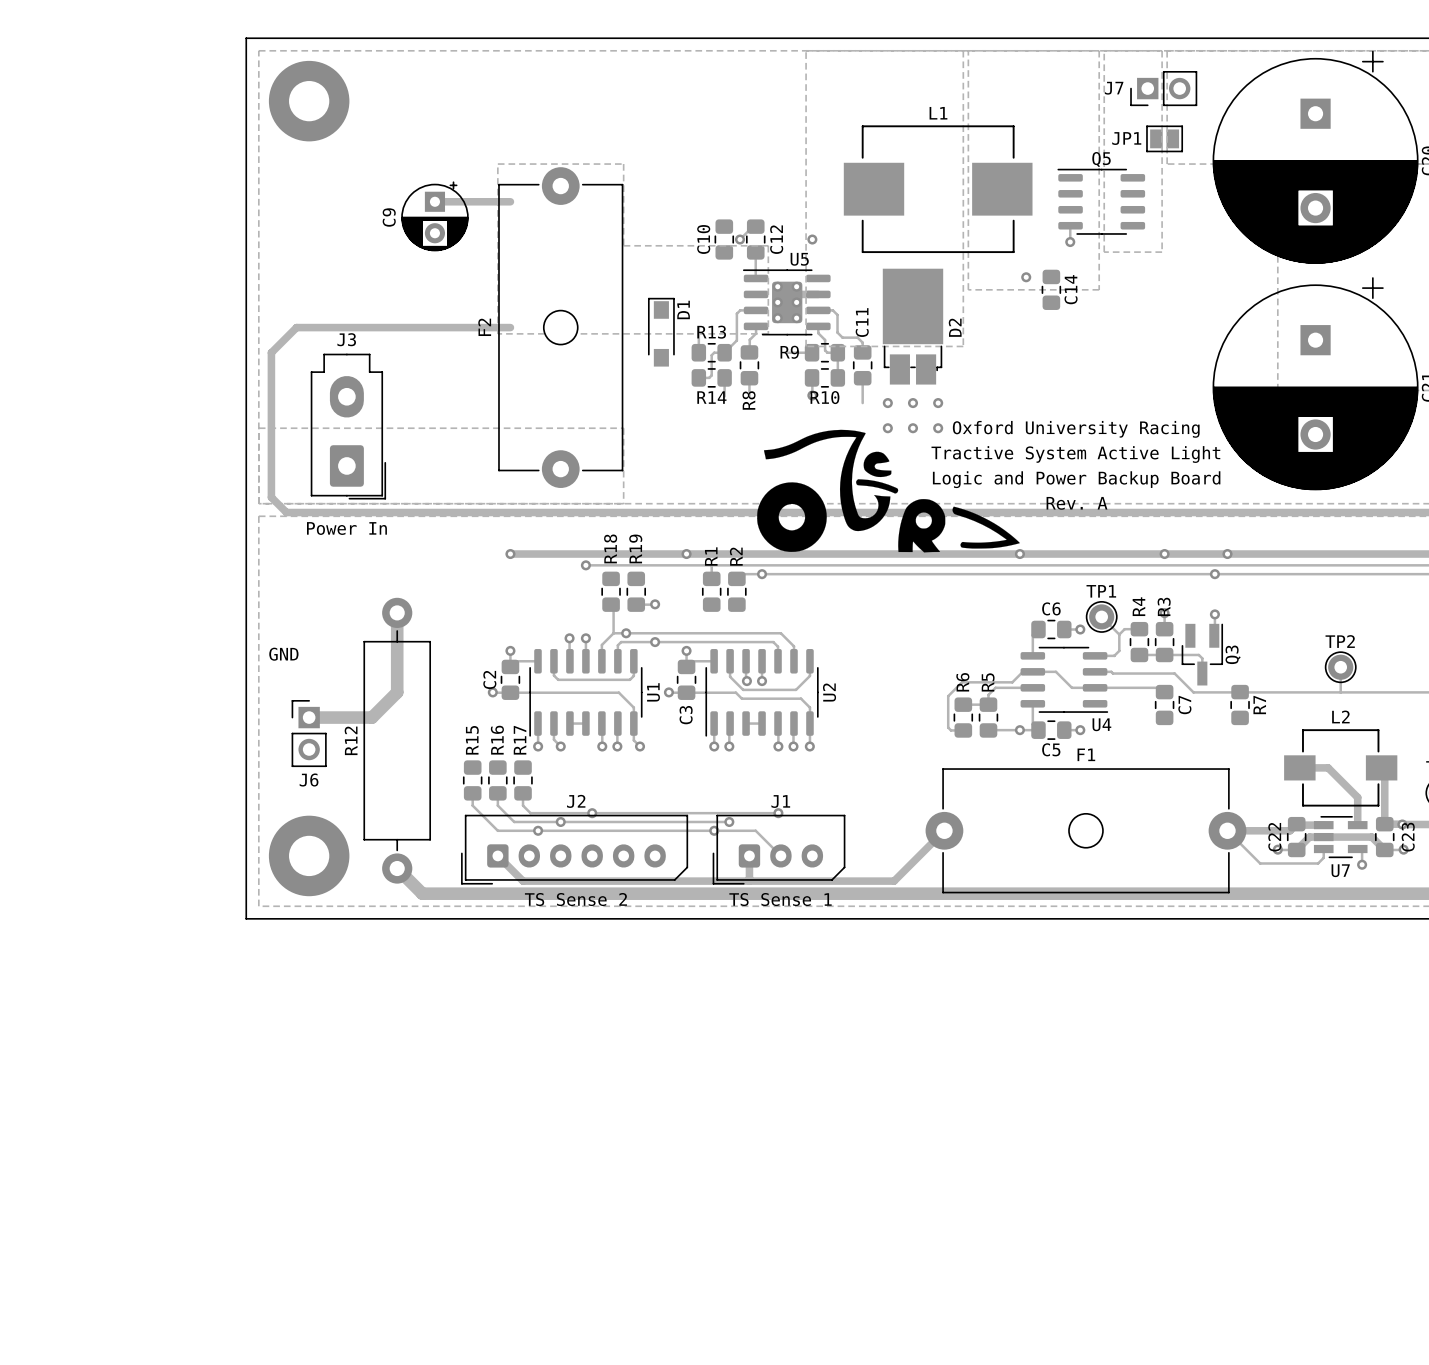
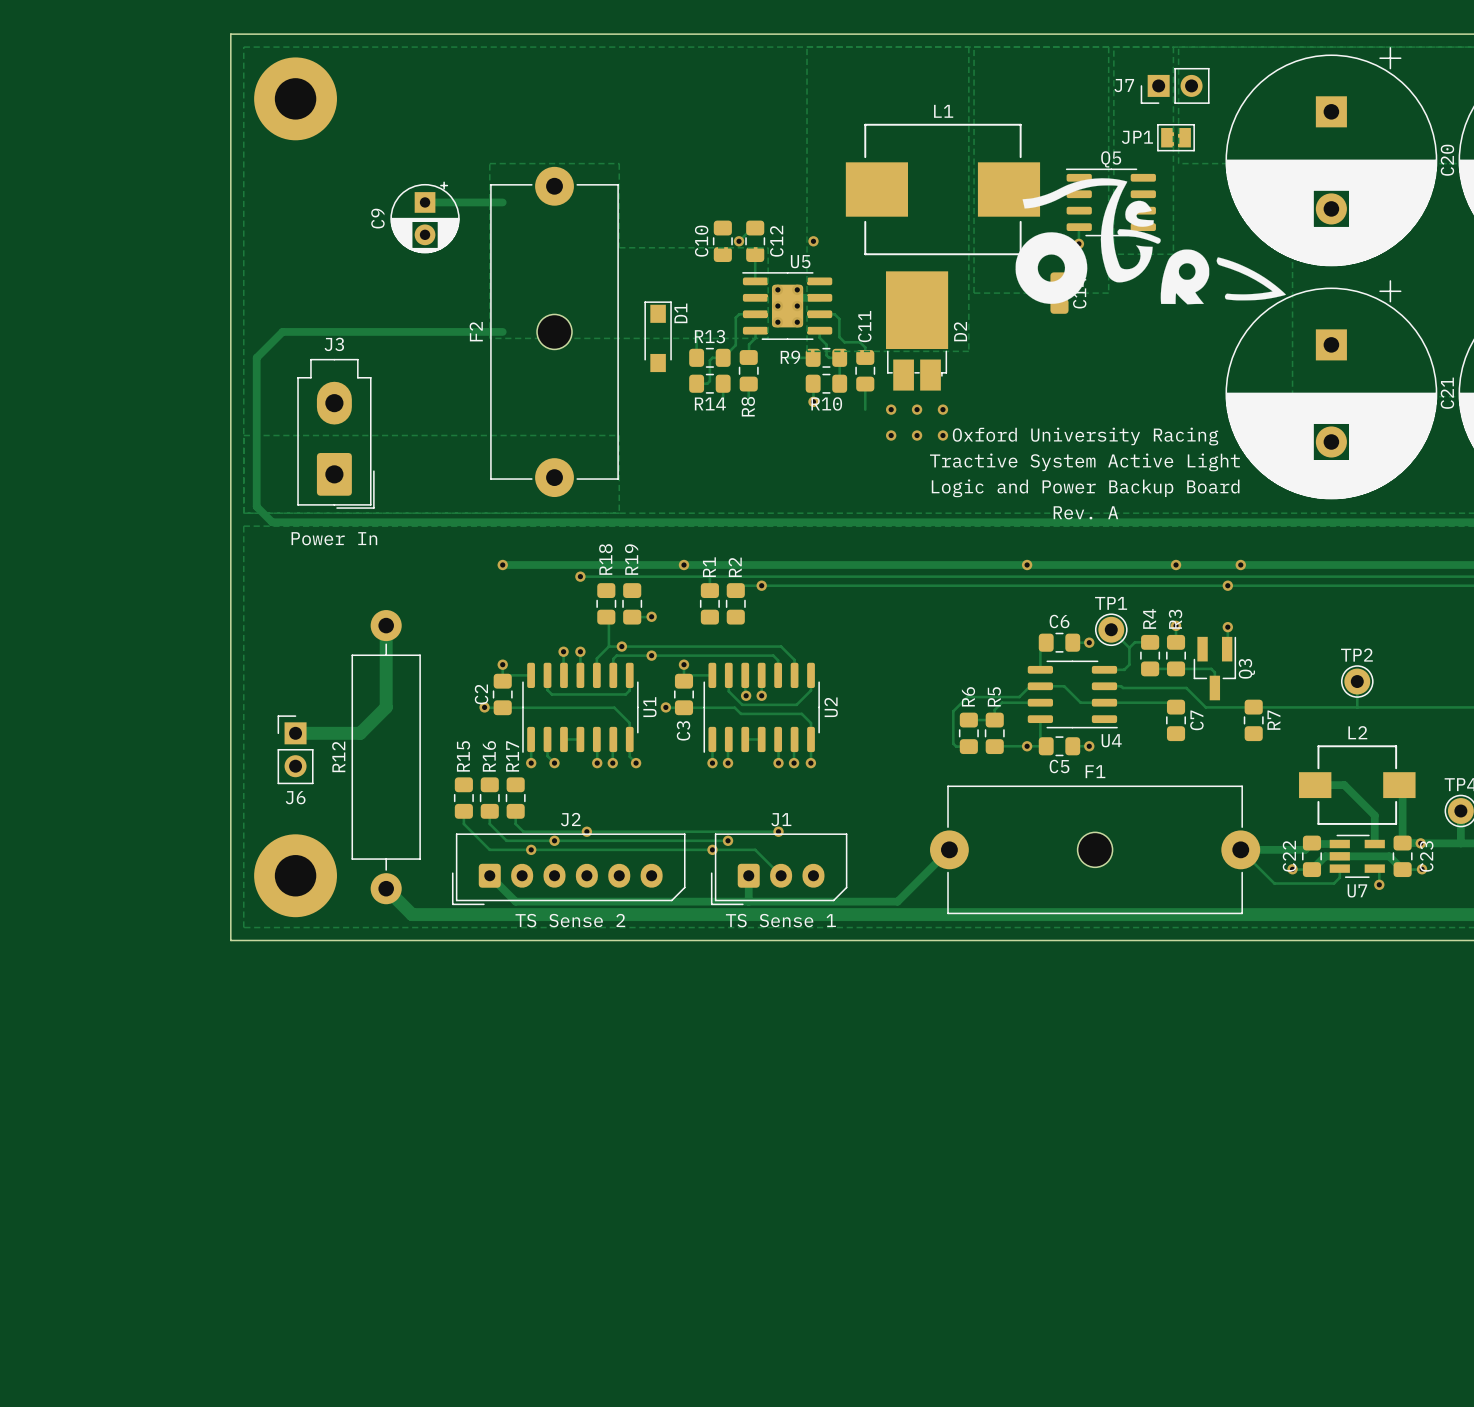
drawing: none -> [1015, 178, 1286, 305]
drawing: [757, 429, 1020, 553] -> none
text: GND (283, 654) -> none

